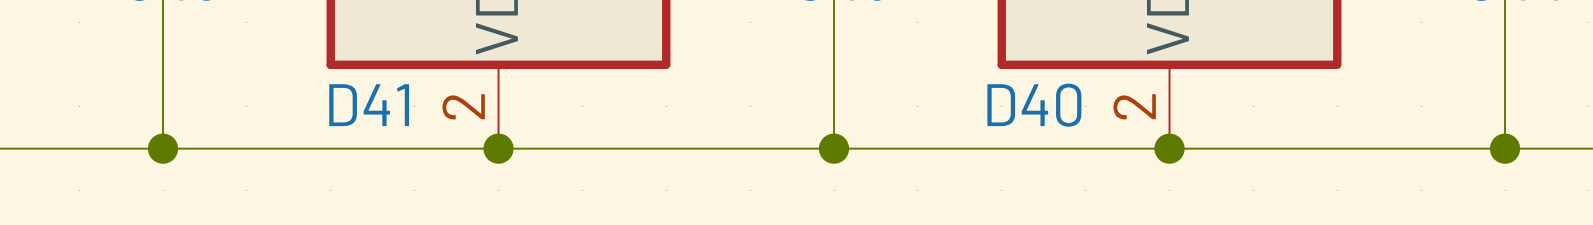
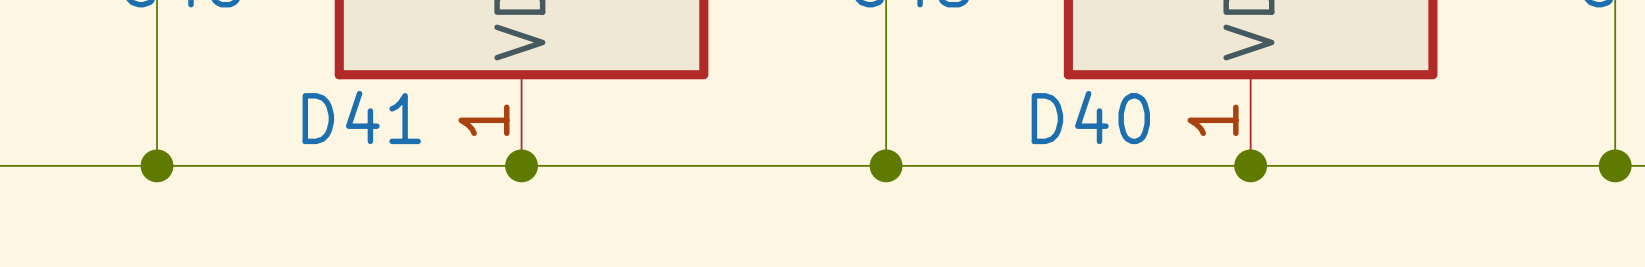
D41 pin number: 2 (463, 106) -> 1 (483, 120)
D40 pin number: 2 (1134, 106) -> 1 (1213, 120)

